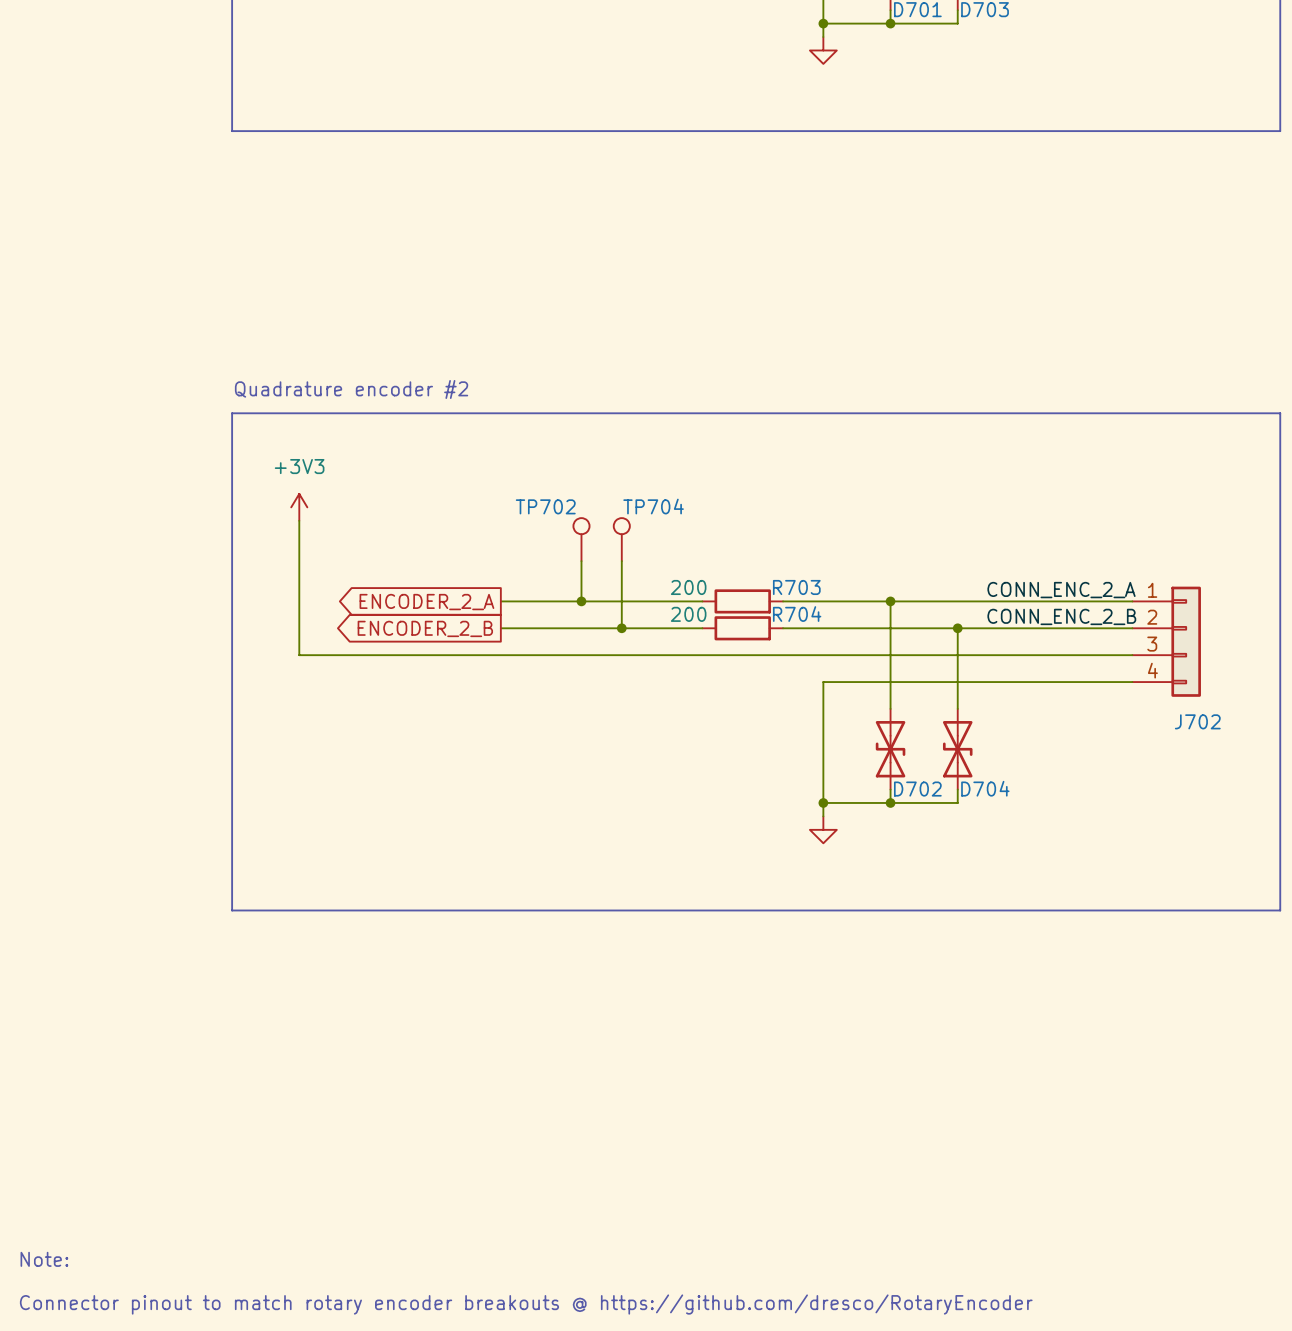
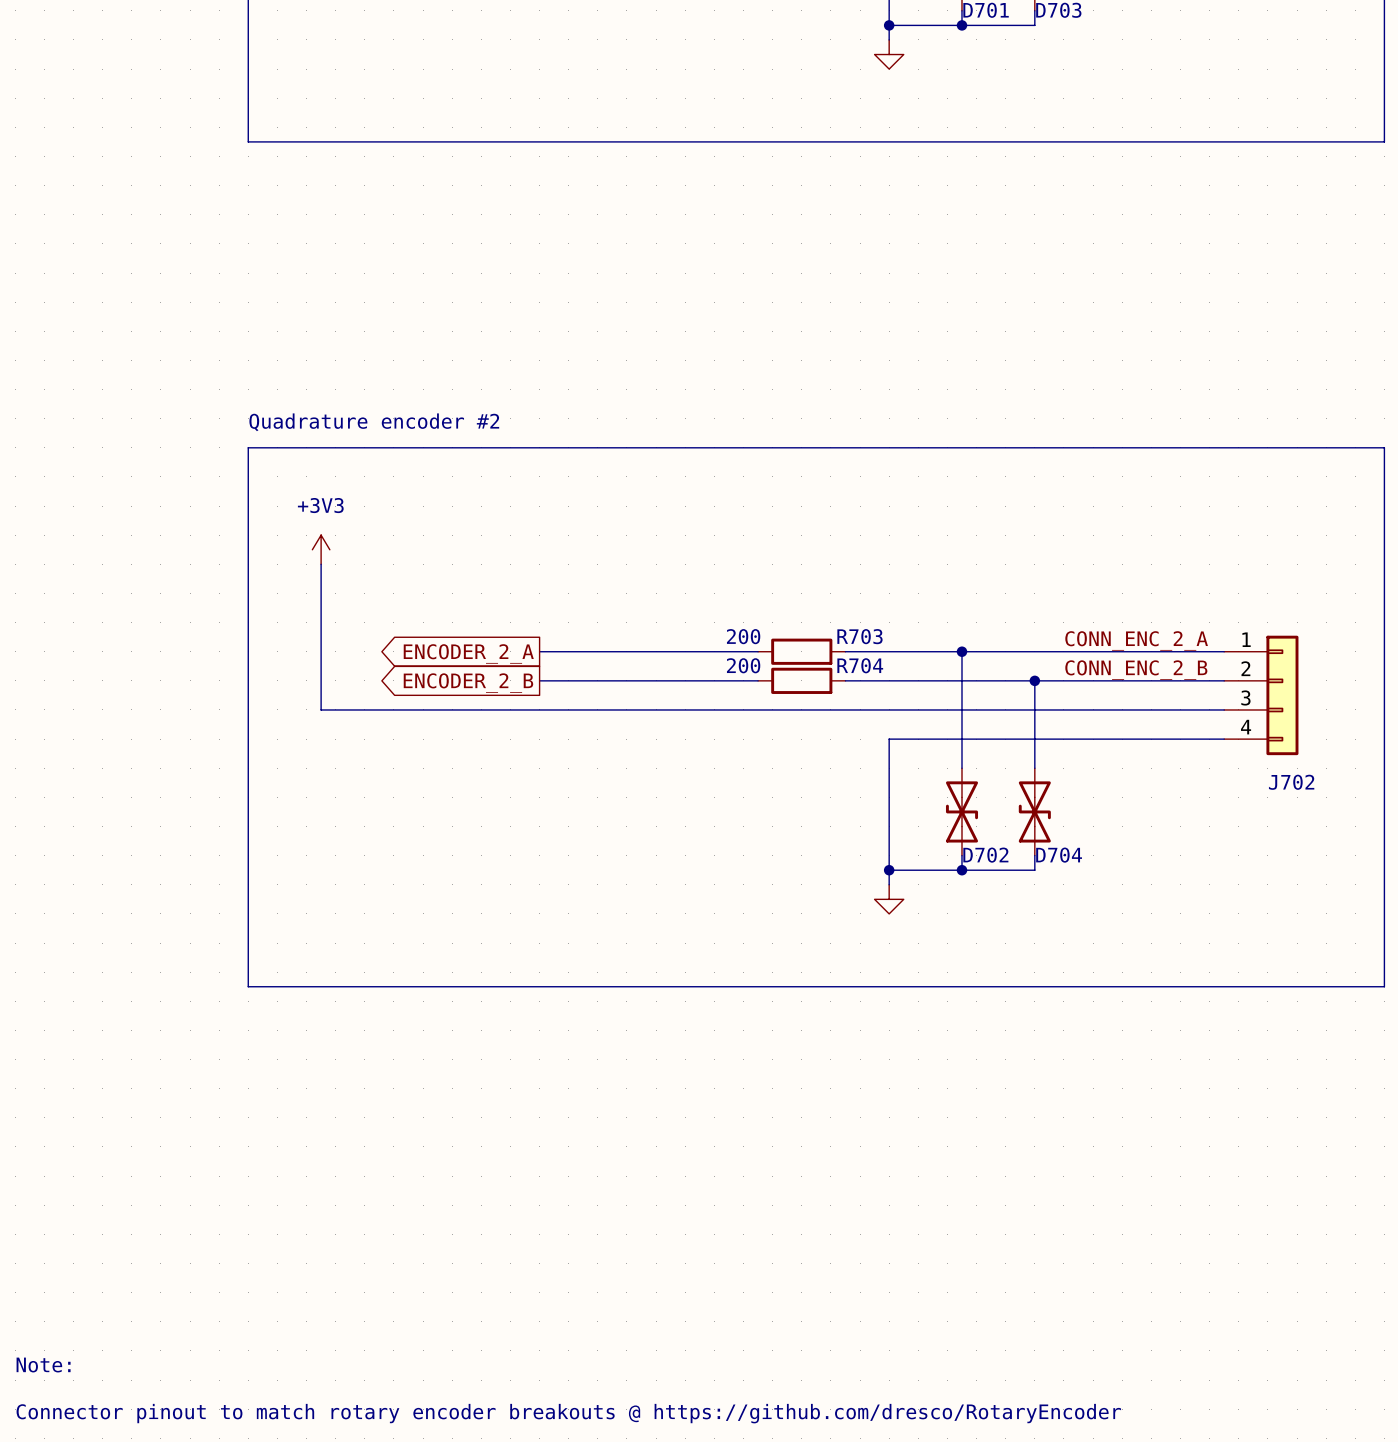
TP702: (581, 539) -> none
TP704: (621, 539) -> none
wire: (581, 561) (581, 601) -> none
wire: (621, 561) (621, 628) -> none
junction: (581, 601) -> none
junction: (621, 628) -> none

